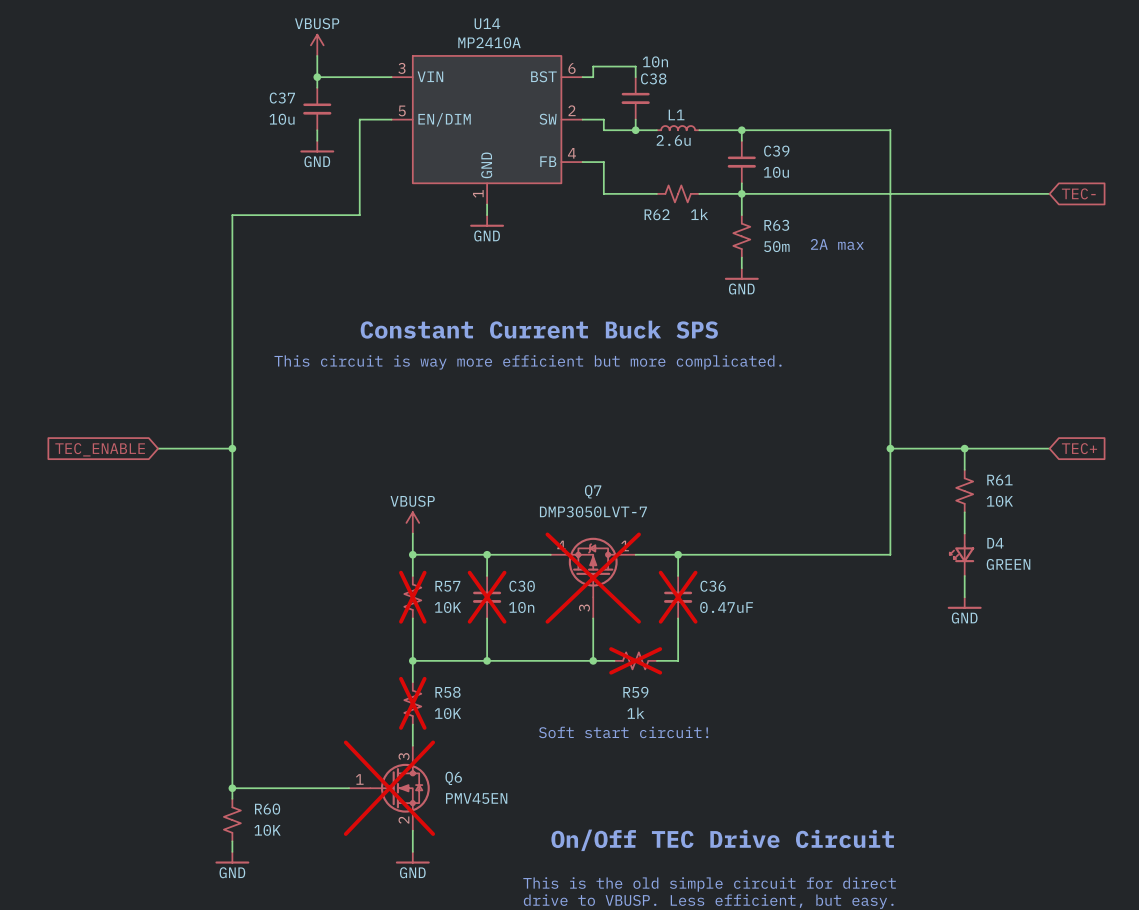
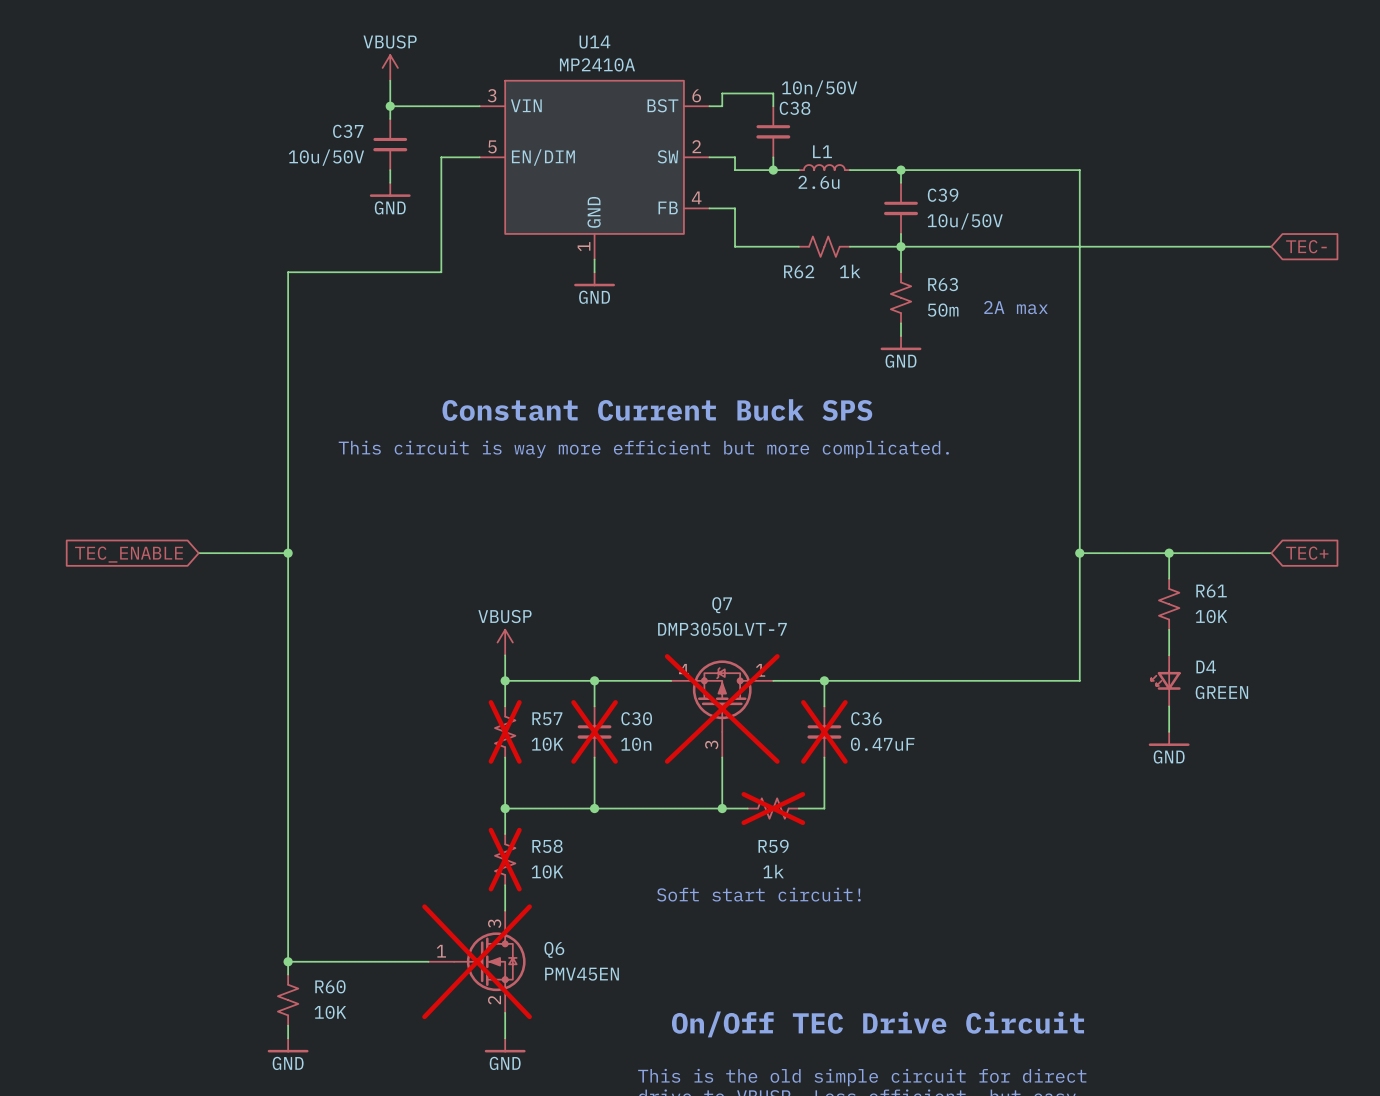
C38 value: 10n (655, 61) -> 10n/50V (819, 88)
C37 value: 10u (282, 119) -> 10u/50V (326, 157)
C39 value: 10u (776, 172) -> 10u/50V (965, 221)

